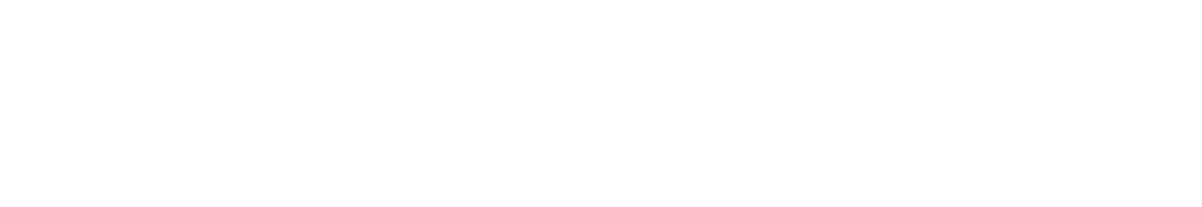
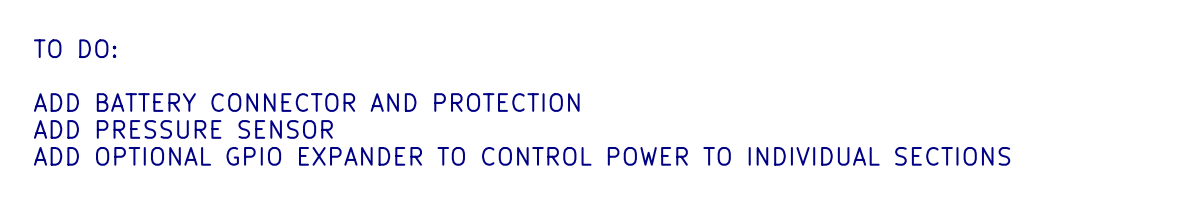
text: none -> TO DO: (75, 48)
text: none -> ADD BATTERY CONNECTOR AND PROTECTION (306, 102)
text: none -> ADD PRESSURE SENSOR (183, 129)
text: none -> ADD OPTIONAL GPIO EXPANDER TO CONTROL POWER TO INDIVIDUAL SECTIONS (522, 156)

